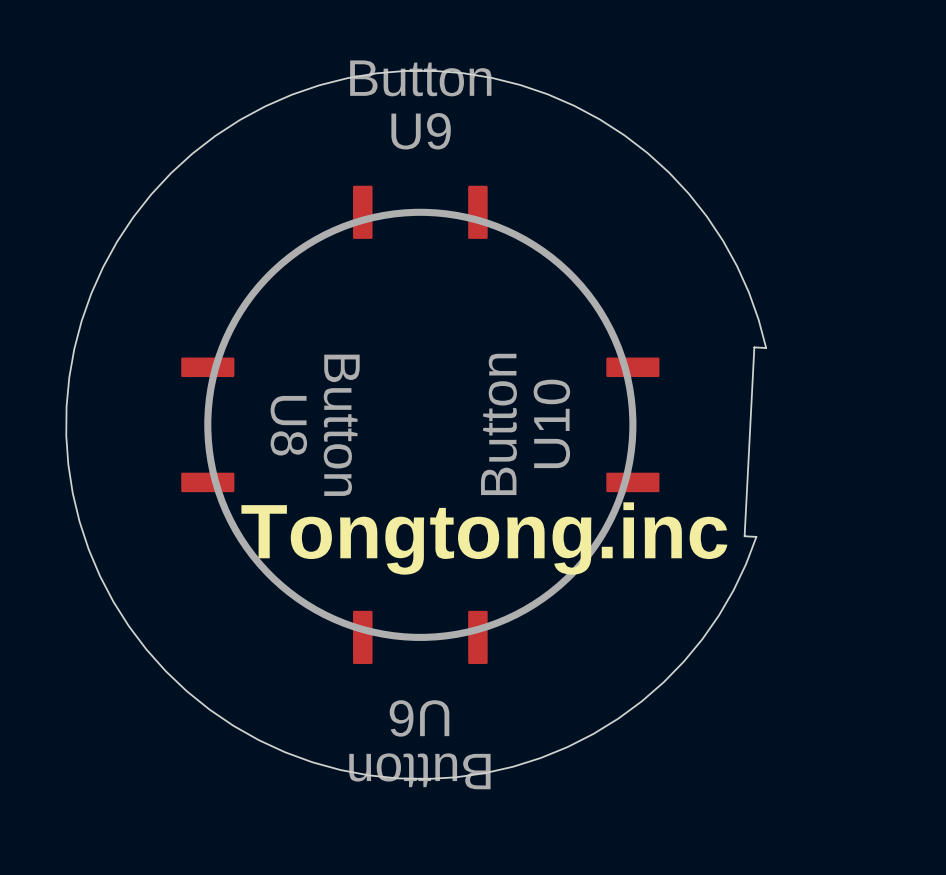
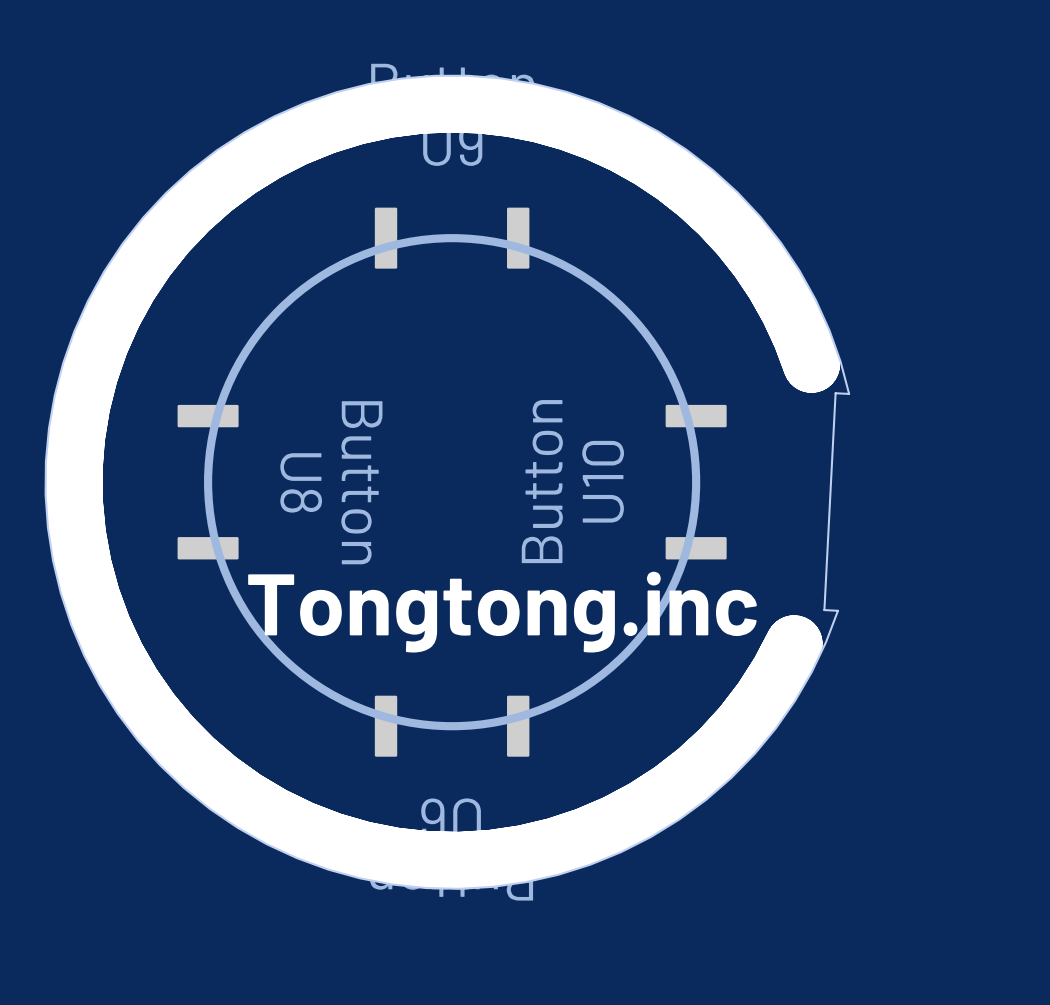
line: none -> (452, 103) (511, 108) (568, 122) (623, 144) (674, 175) (697, 194) (719, 214) (739, 236) (757, 259) (774, 283) (788, 309) (801, 336) (811, 364) (788, 309) (757, 259) (739, 236) (719, 214) (697, 194) (674, 175) (623, 144) (568, 122) (511, 108) (452, 103)
line: none -> (452, 103) (387, 109) (325, 125) (266, 152) (213, 188) (189, 210) (146, 258) (113, 314) (100, 343) (81, 405) (74, 469) (77, 534) (91, 597) (116, 656) (151, 711) (194, 758) (245, 798) (301, 829) (363, 849) (426, 859) (459, 860) (491, 858) (523, 853) (554, 846) (585, 836) (615, 823) (643, 808) (670, 790) (696, 770) (720, 749) (741, 725) (761, 699) (779, 672) (794, 643) (761, 699) (720, 749) (670, 790) (643, 808) (615, 823) (554, 846) (523, 853) (491, 858) (459, 860) (426, 859) (394, 856) (363, 849) (332, 840) (301, 829) (272, 815) (245, 798) (194, 758) (171, 735) (151, 711) (132, 684) (116, 656) (102, 627) (91, 597) (83, 565) (77, 534) (74, 501) (74, 469) (76, 437) (81, 405) (89, 374) (100, 343) (113, 314) (128, 285) (146, 258) (166, 233) (189, 210) (213, 188) (266, 152) (295, 137) (325, 125) (356, 116) (387, 109) (452, 103)

